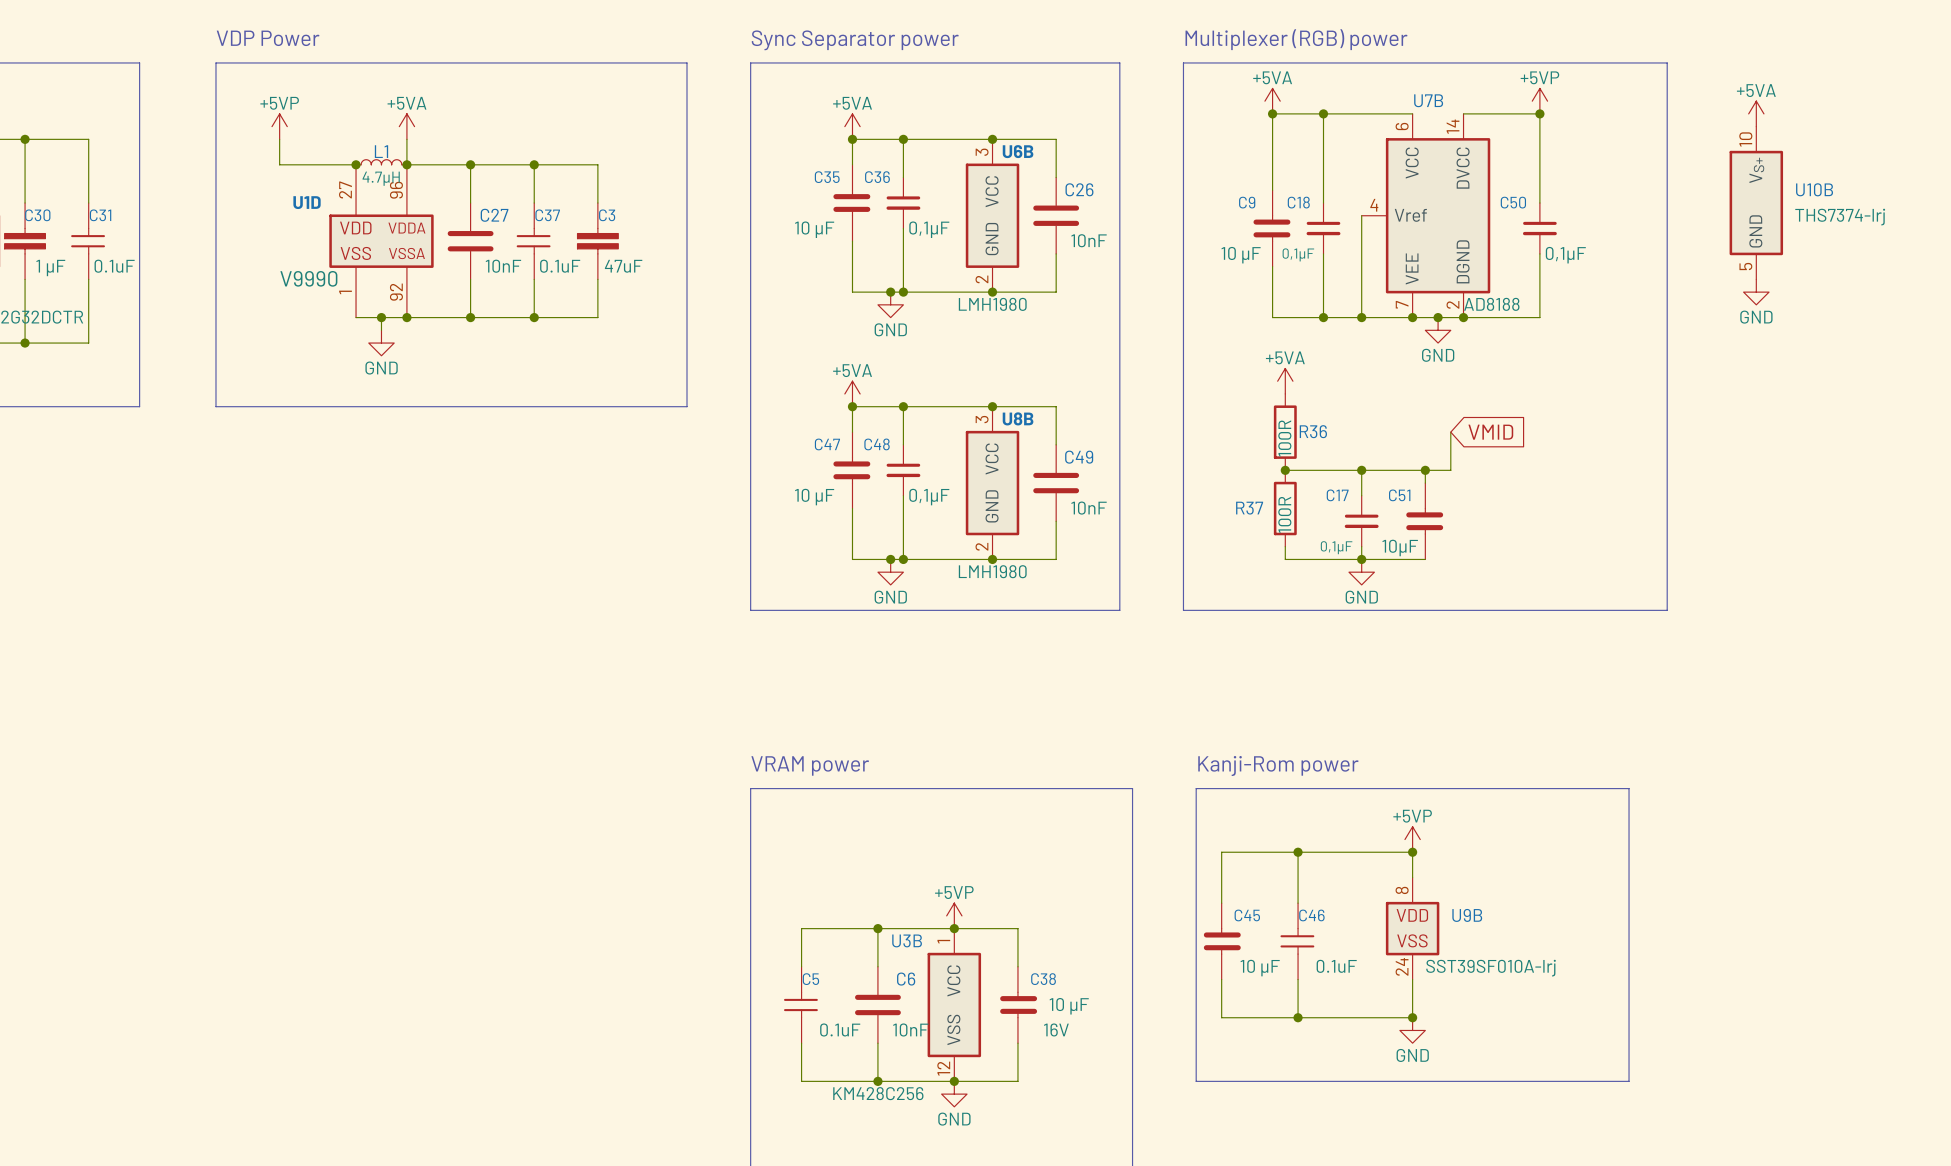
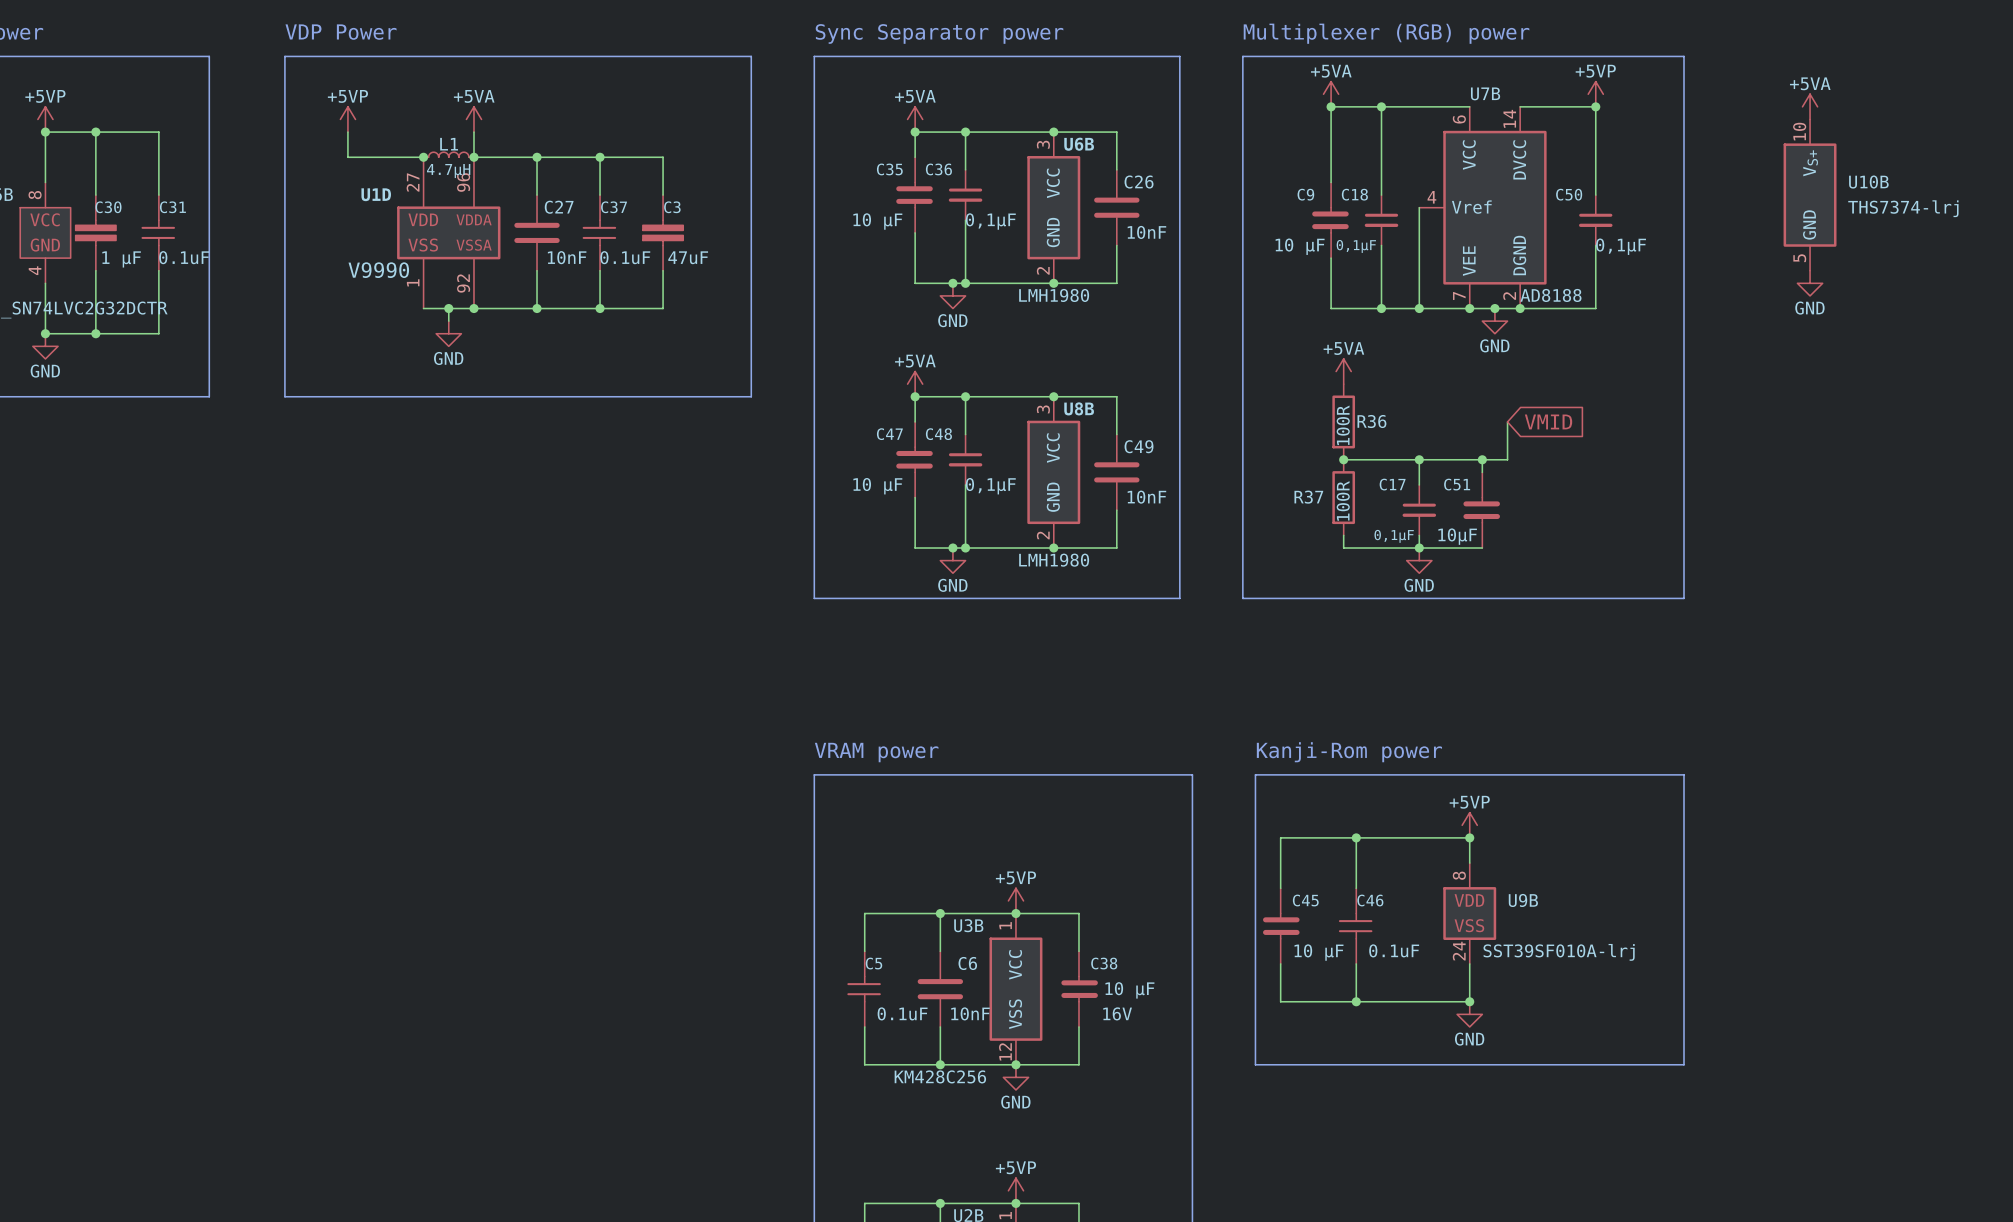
line: (1629, 62) (1667, 62) (1667, 610) (1629, 610) -> (1684, 56) (1684, 598)

